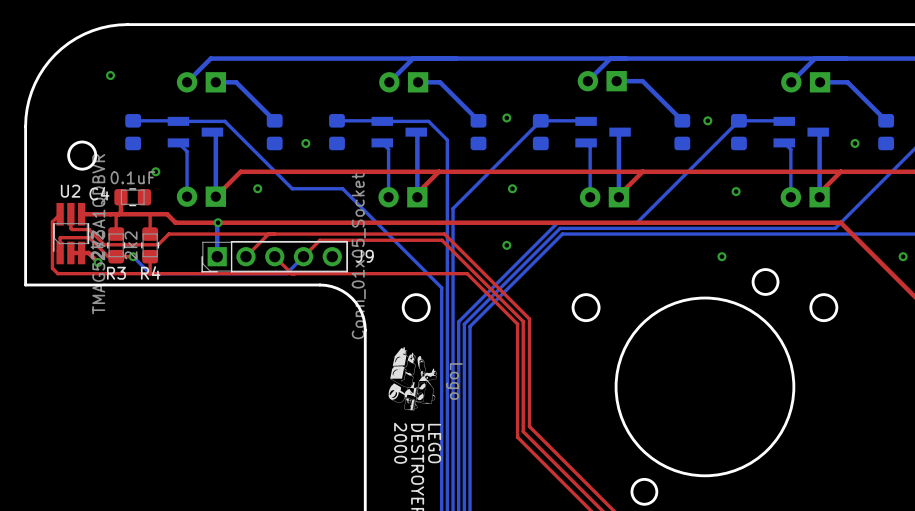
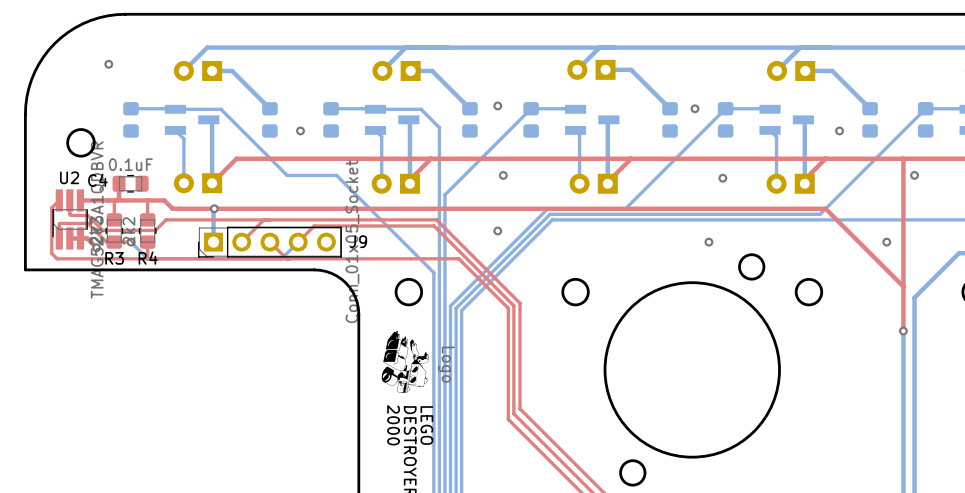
via: (155, 171) -> none
via: (257, 188) -> none

